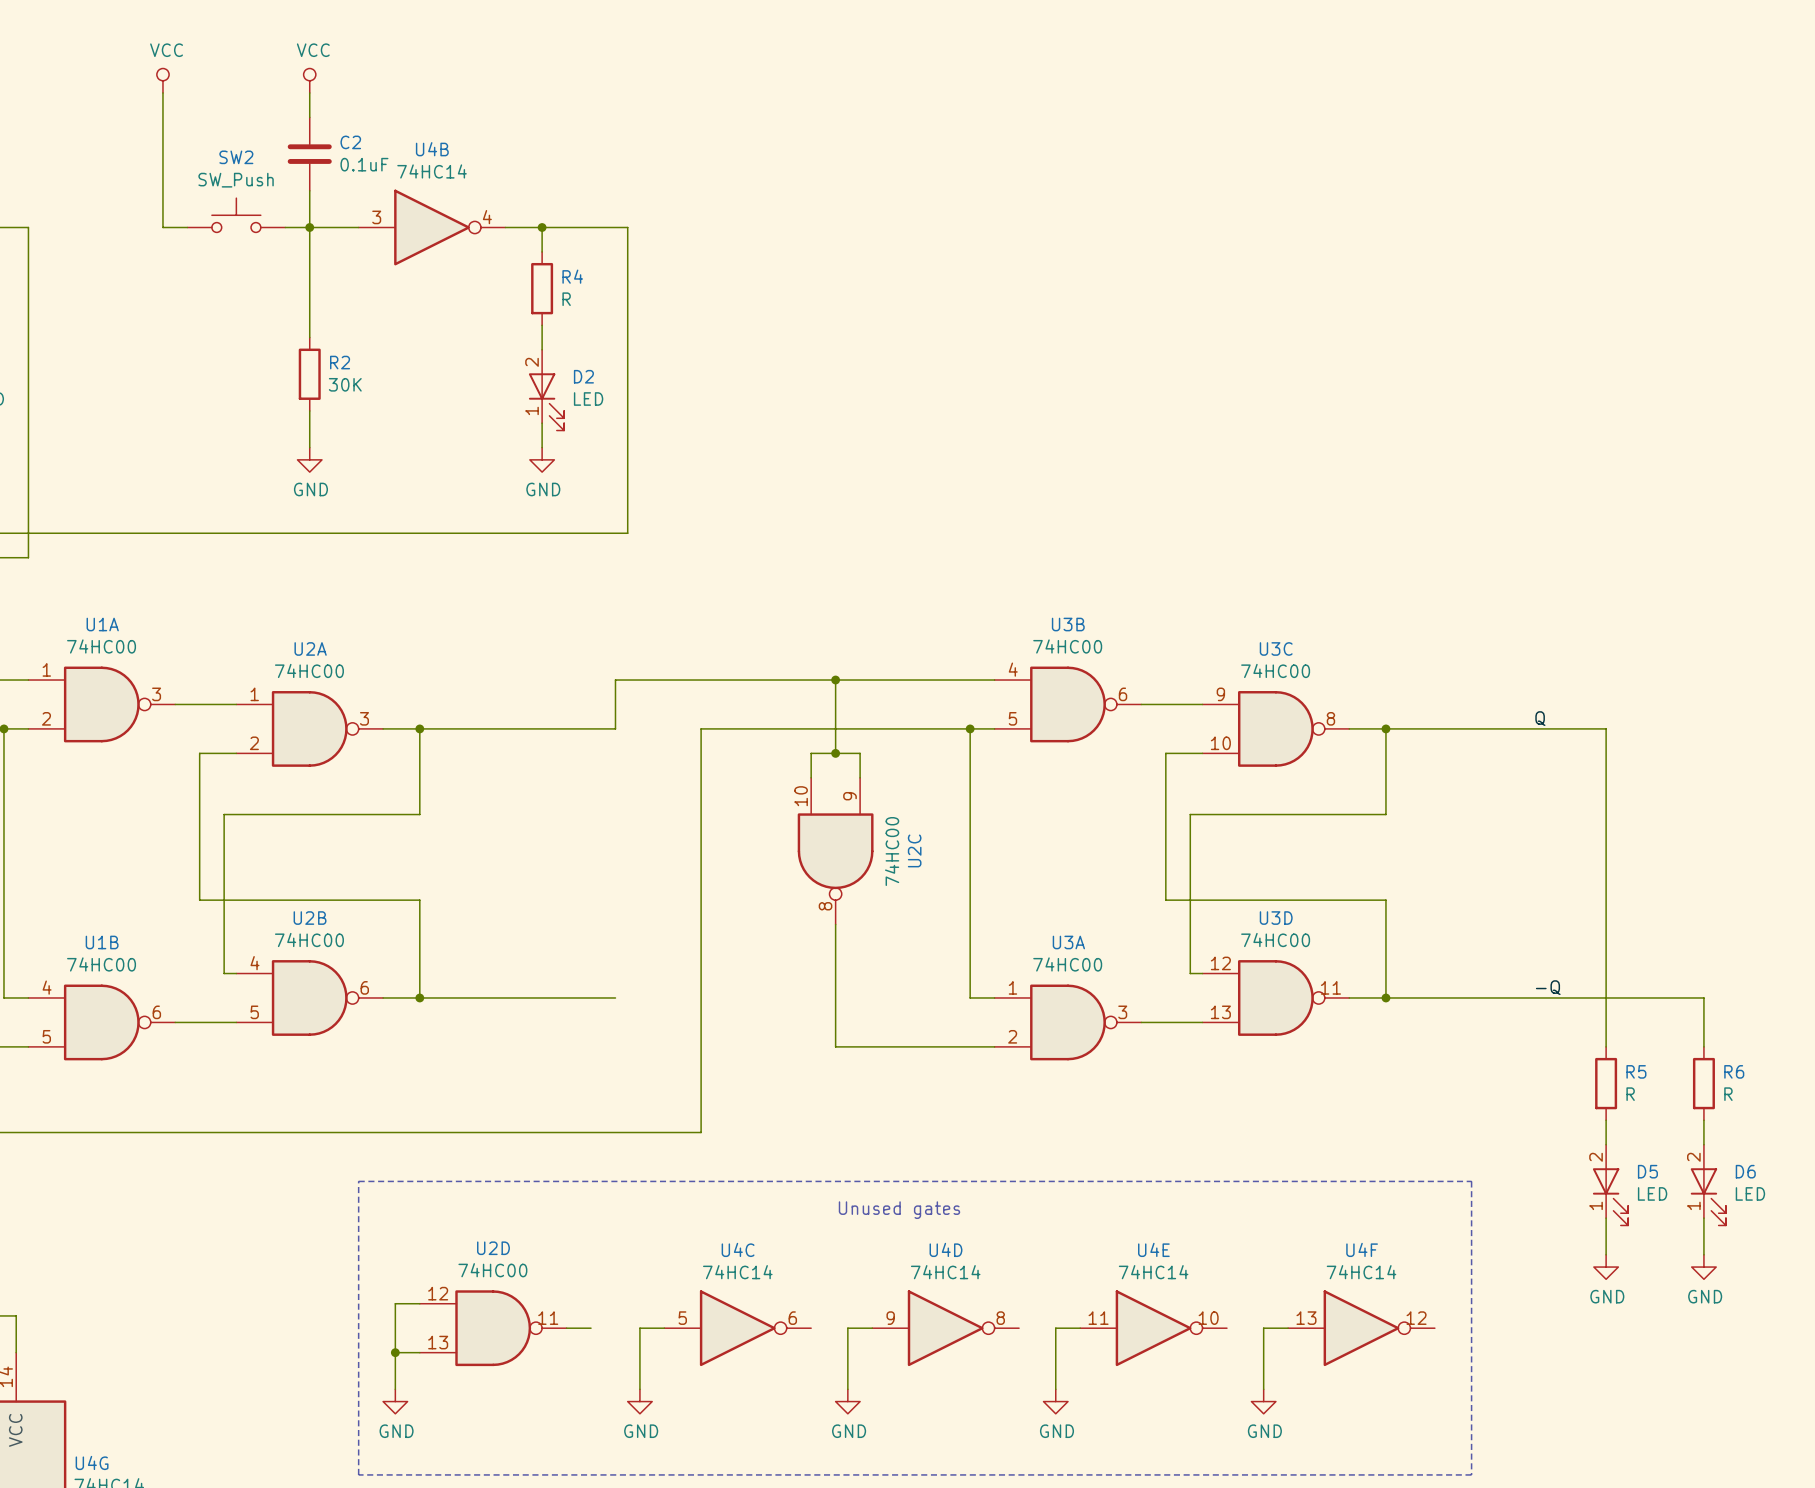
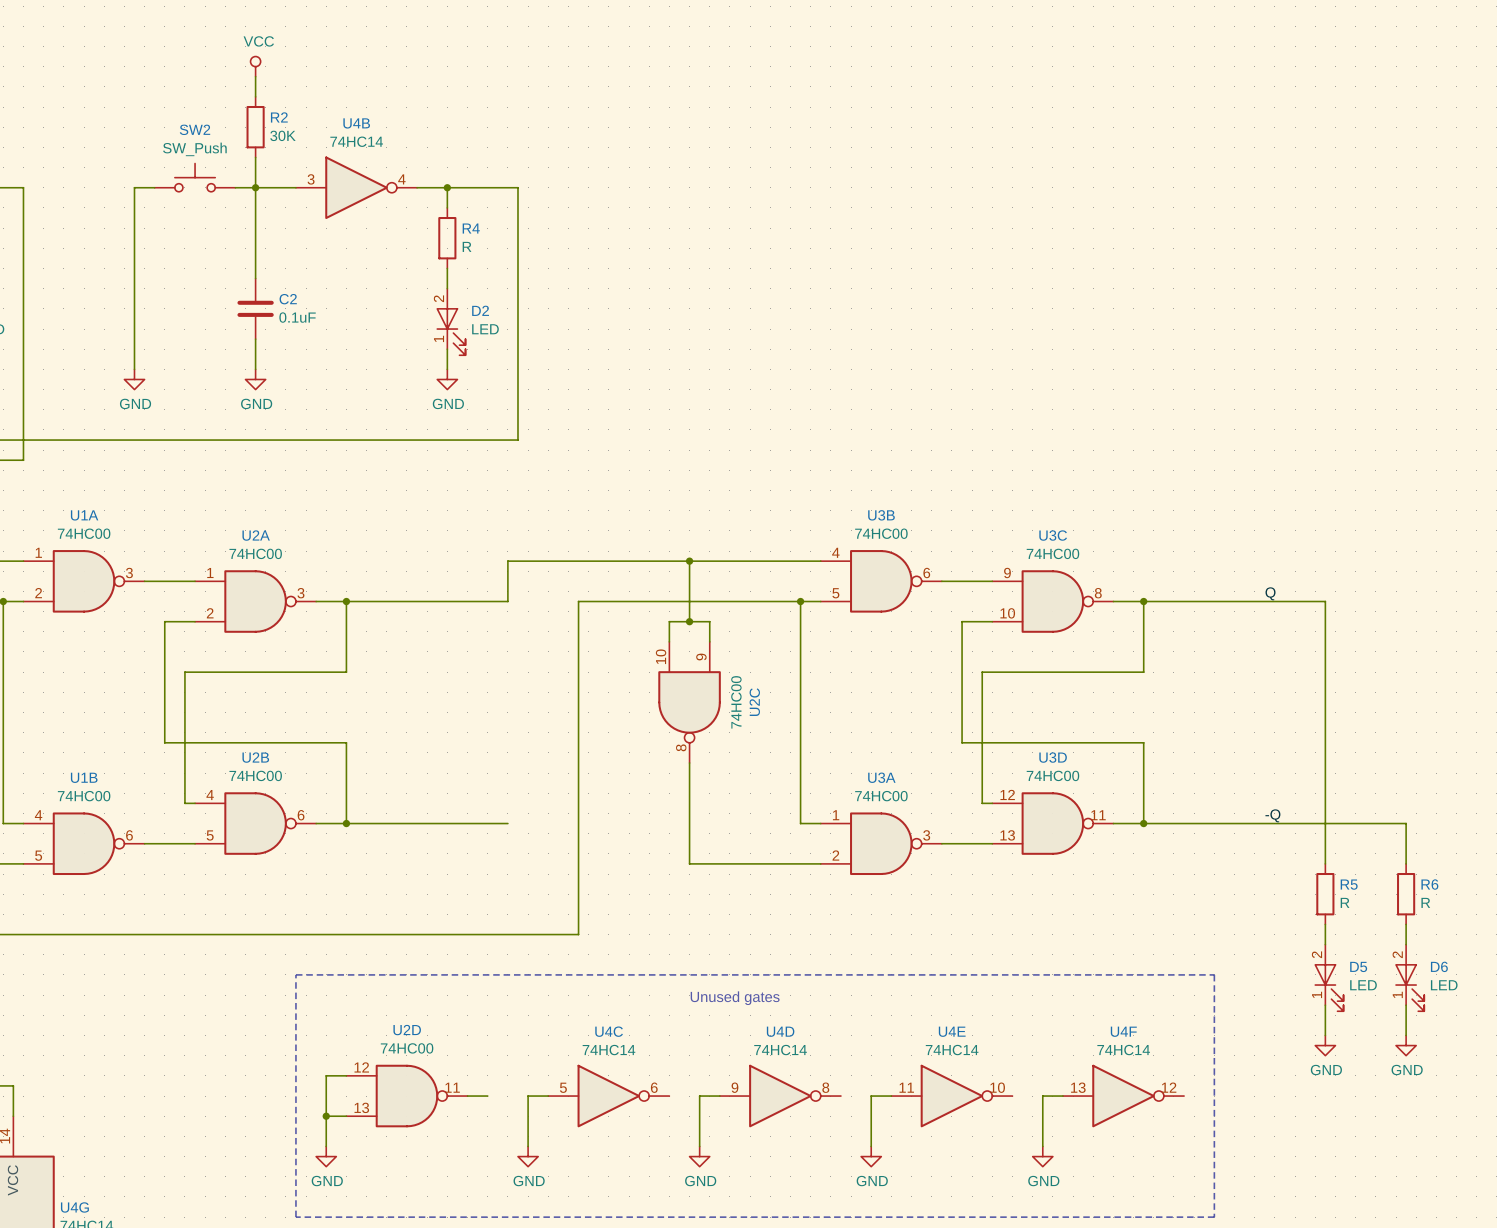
power symbol: VCC (162, 80) -> none
wire: (162, 92) (162, 227) -> (134, 369) (134, 187)
C2 position: (309, 154) -> (255, 308)
R2 position: (309, 374) -> (255, 127)
power symbol: none -> GND (134, 379)

